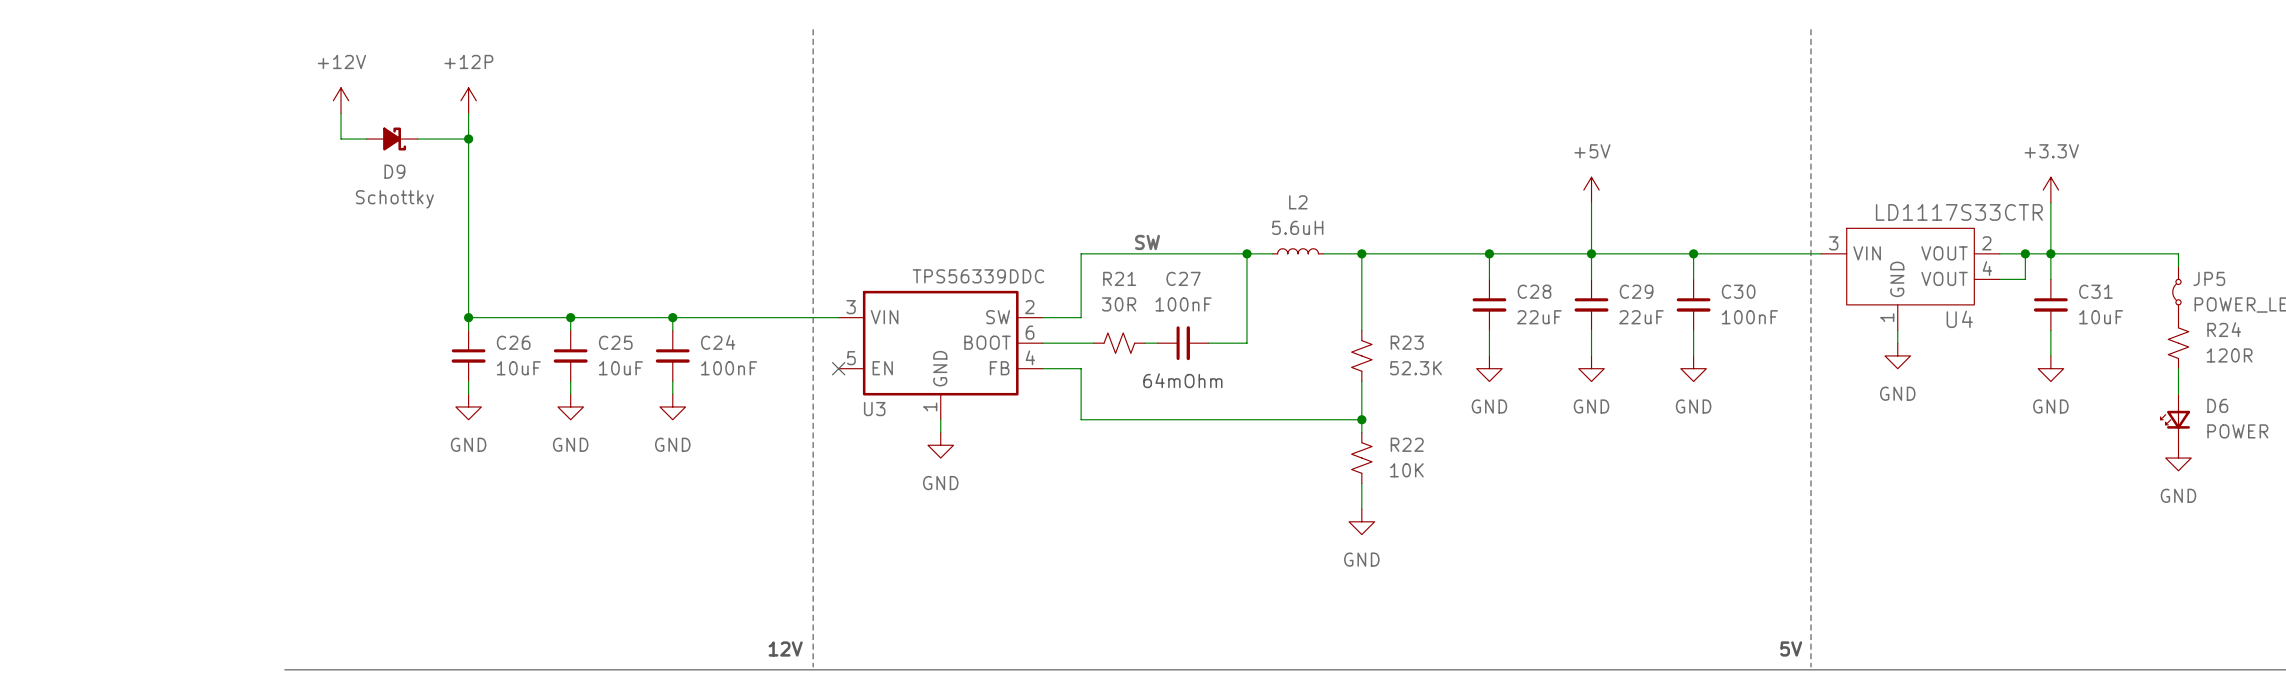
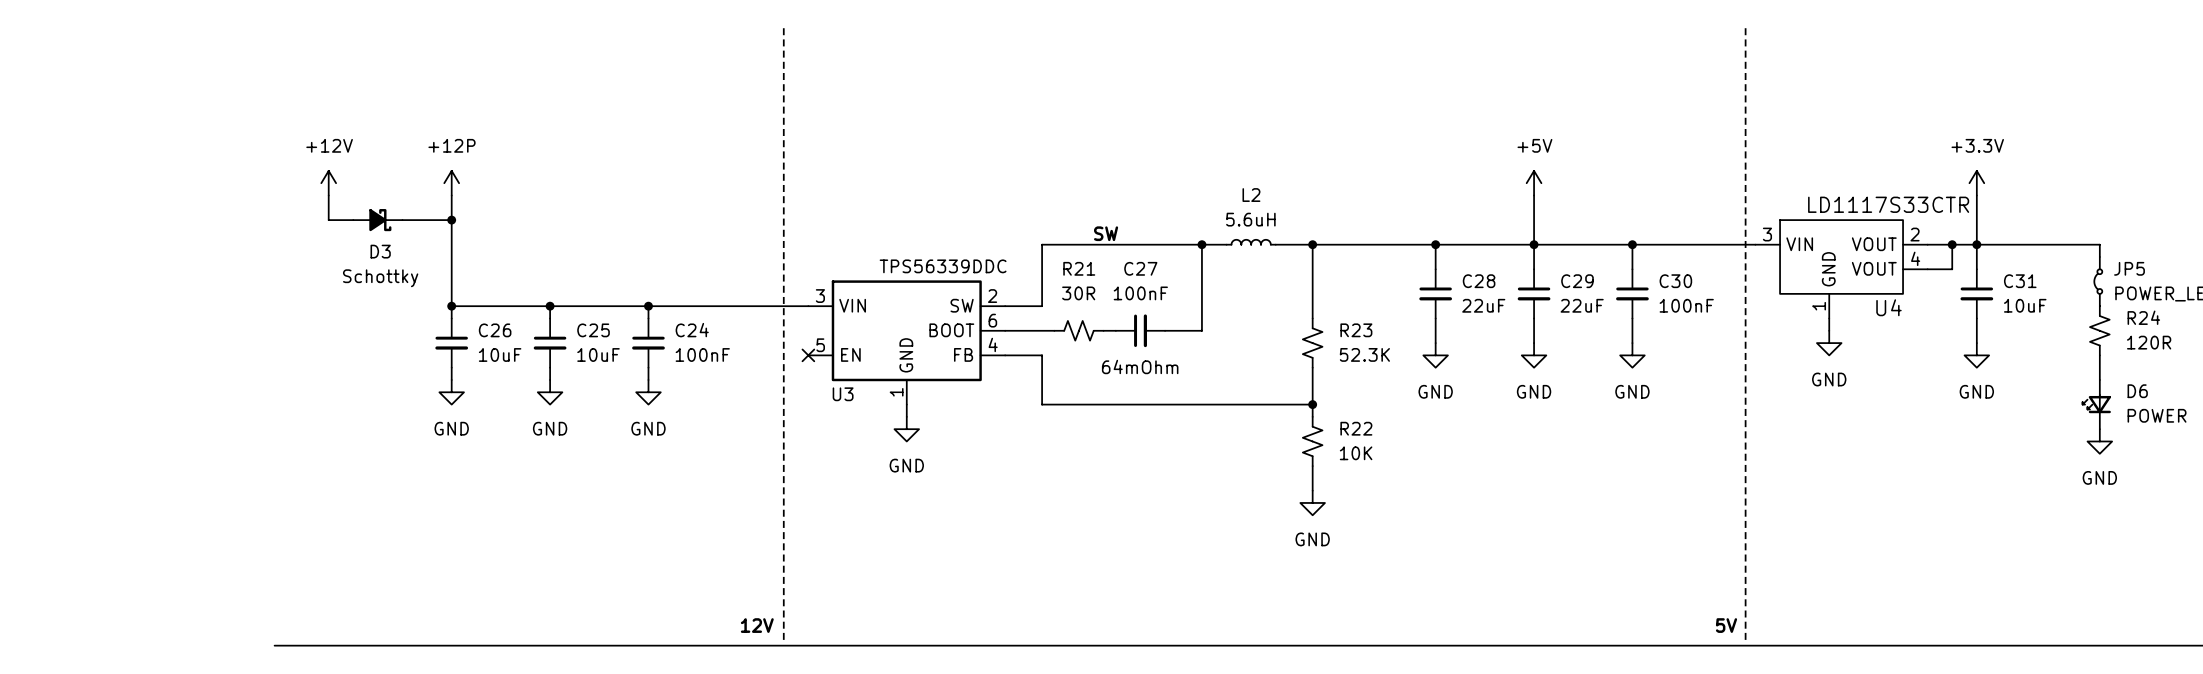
power symbol position: +12V (341, 100) -> +12V (328, 183)
power symbol position: +12P (468, 100) -> +12P (451, 183)
wire: (341, 113) (341, 139) (366, 139) -> (328, 195) (328, 220) (353, 220)
wire: (468, 113) (468, 202) -> none
D9: Schottky (392, 139) -> none
wire: (417, 139) (468, 139) -> (402, 220) (451, 220)
junction: (468, 139) -> none
D3: none -> Schottky (377, 220)
junction: none -> (451, 220)

